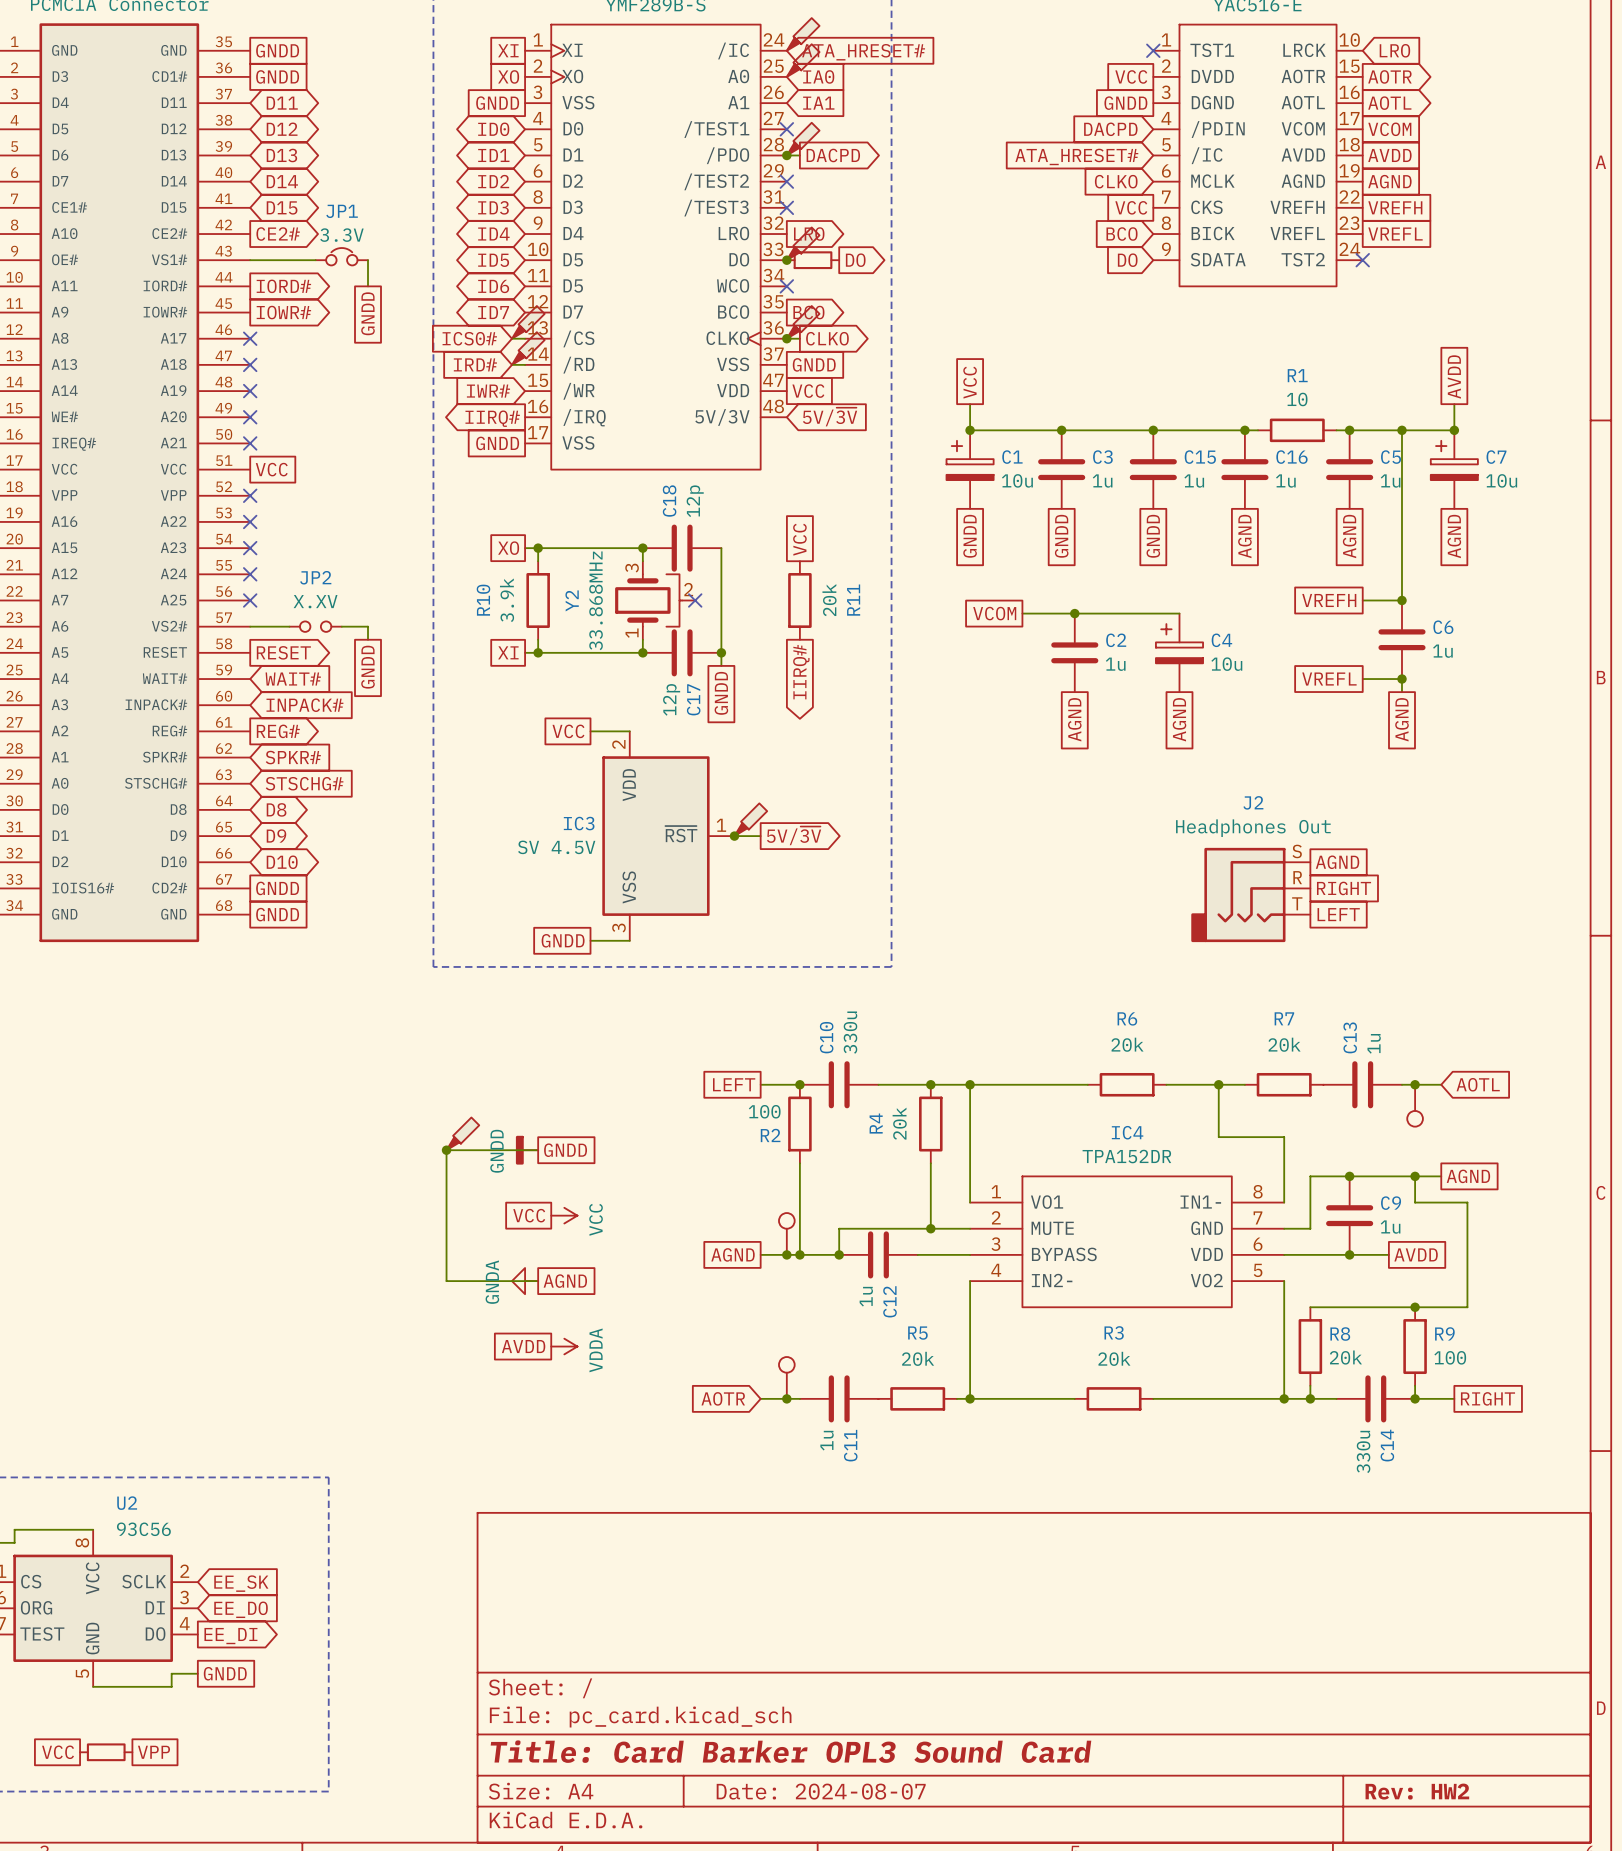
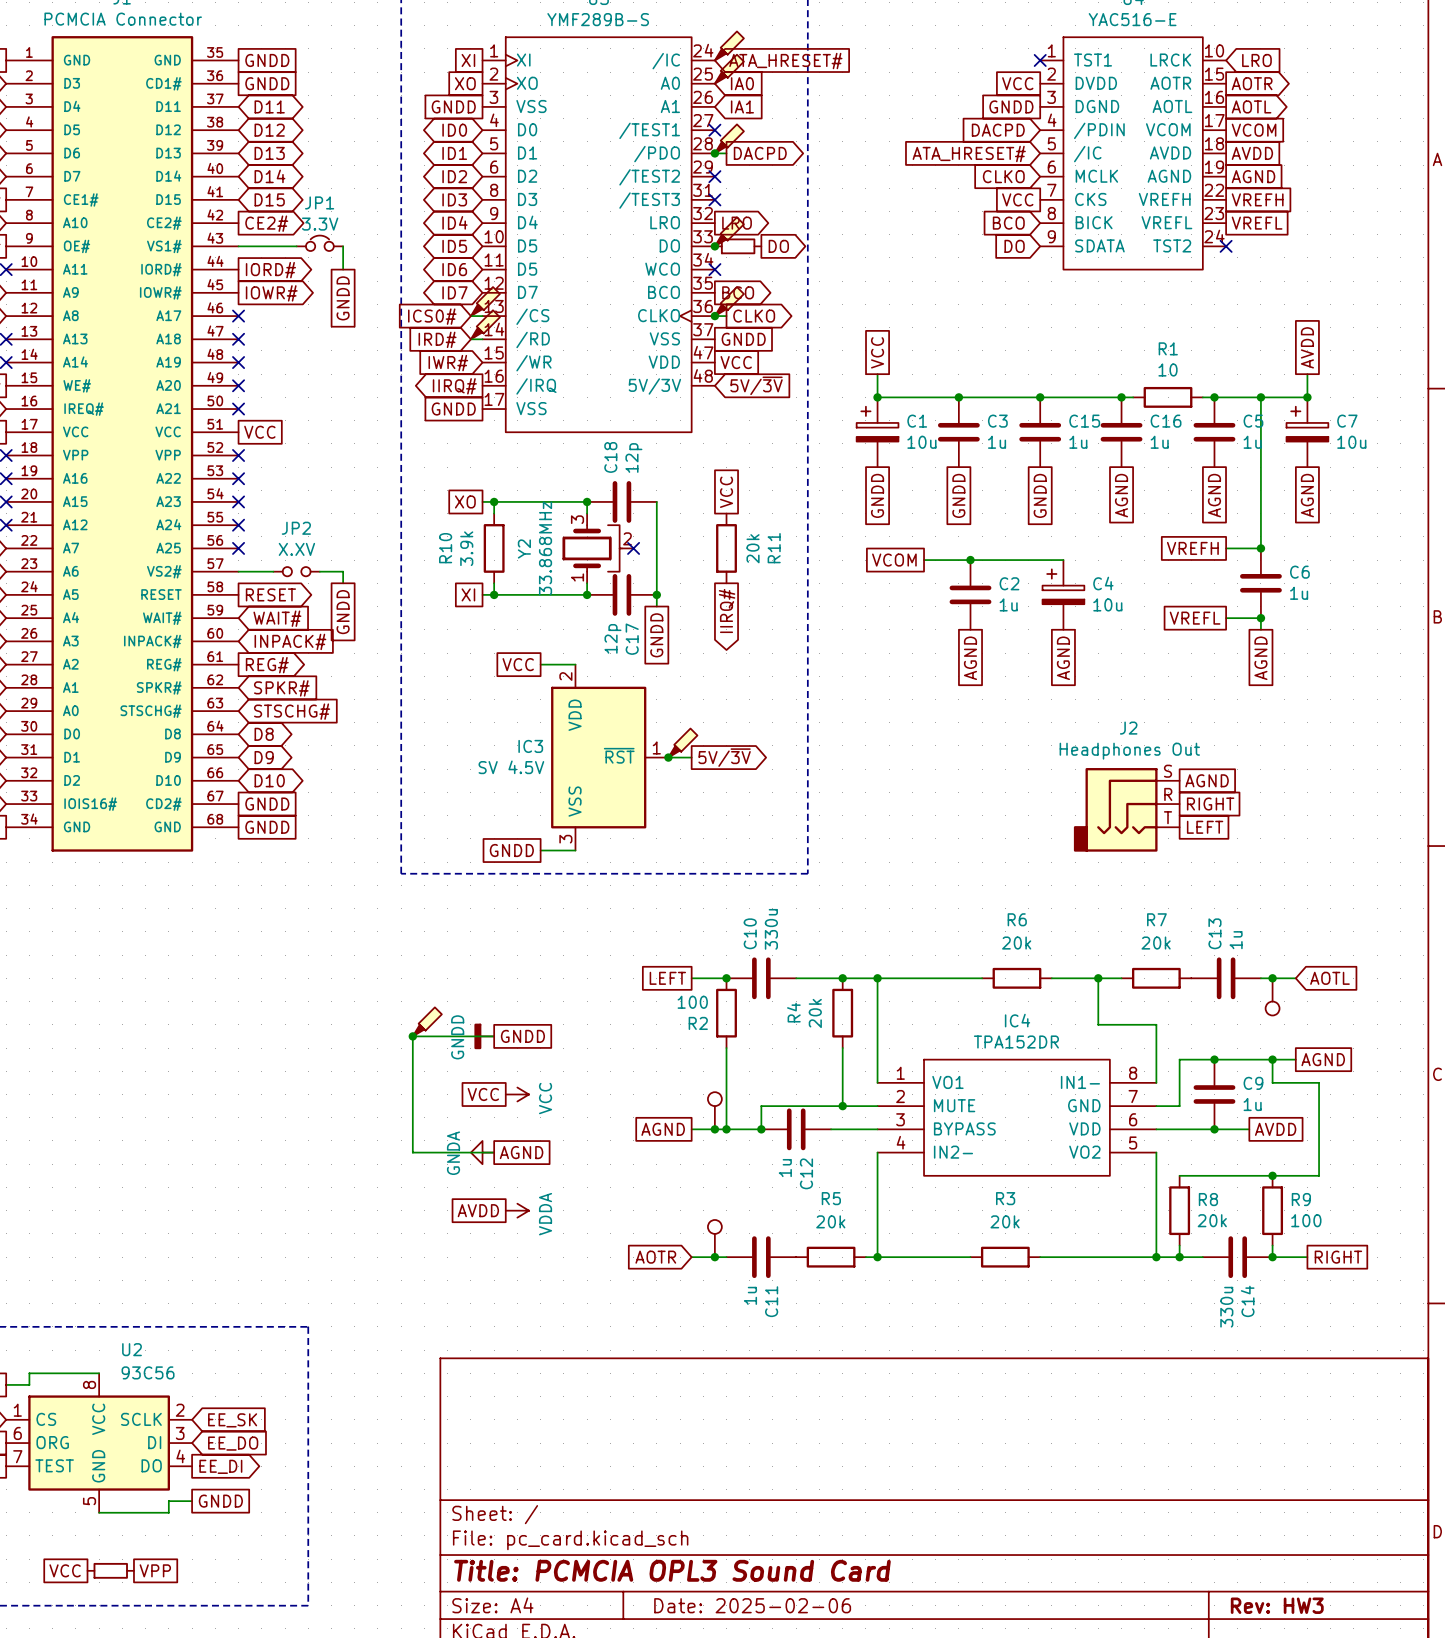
title block: Title: Card Barker OPL3 Sound Card (790, 1751) -> Title: PCMCIA OPL3 Sound Card (672, 1570)
title block: Date: 2024-08-07 (821, 1791) -> Date: 2025-02-06 (752, 1605)
title block: Rev: HW2 (1417, 1791) -> Rev: HW3 (1277, 1605)

